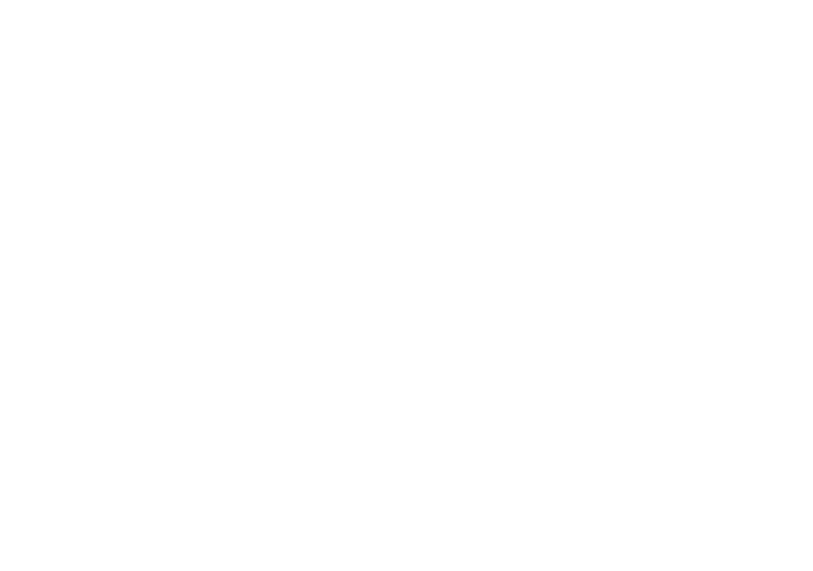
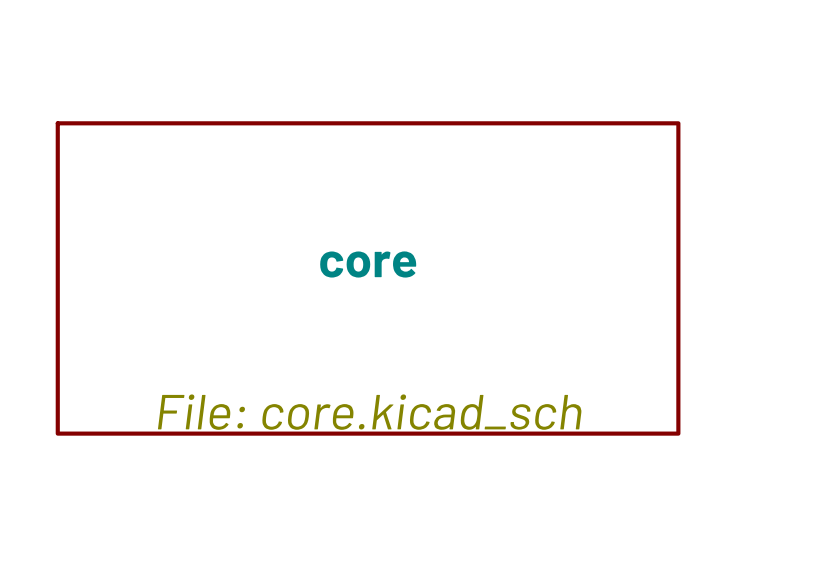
sheet core: none -> File: core.kicad_sch (368, 278)

